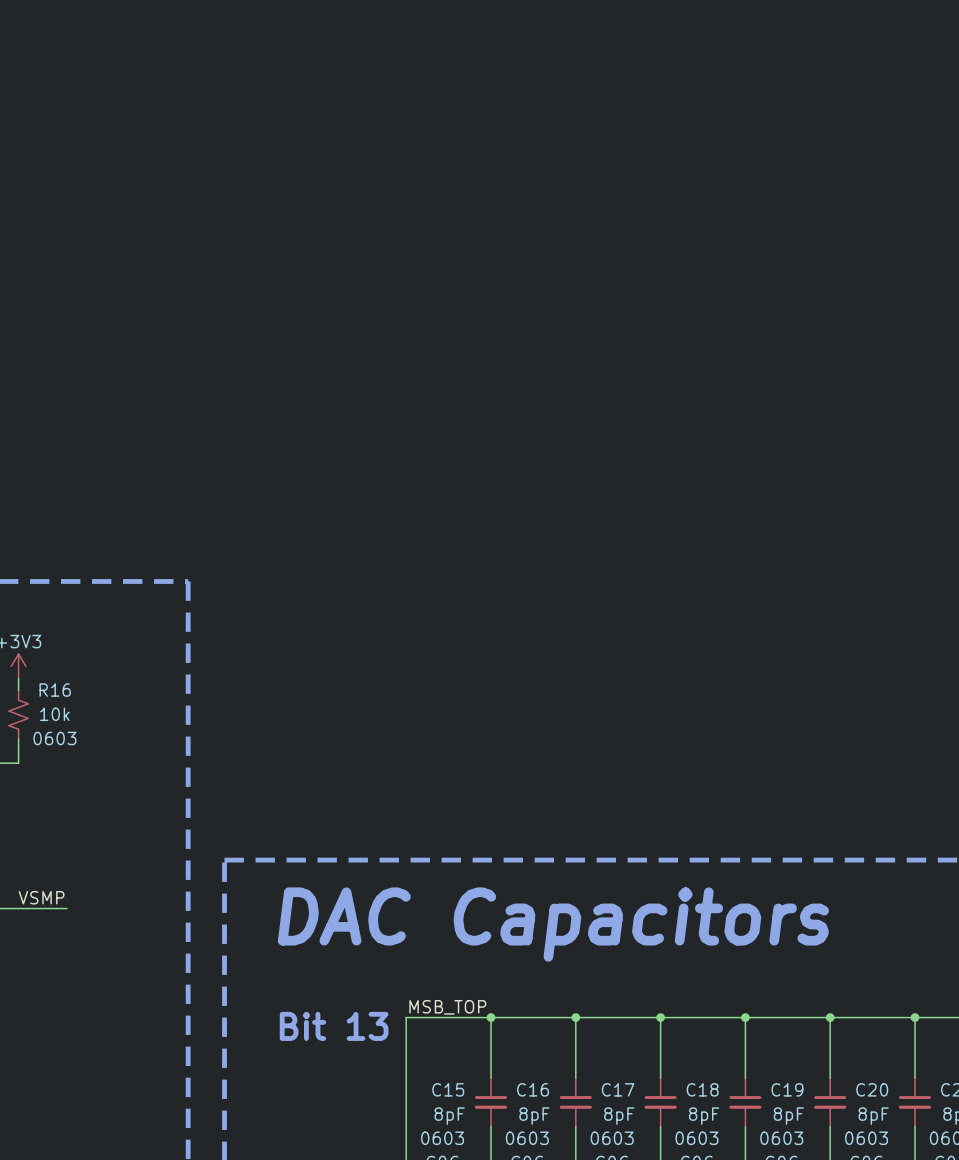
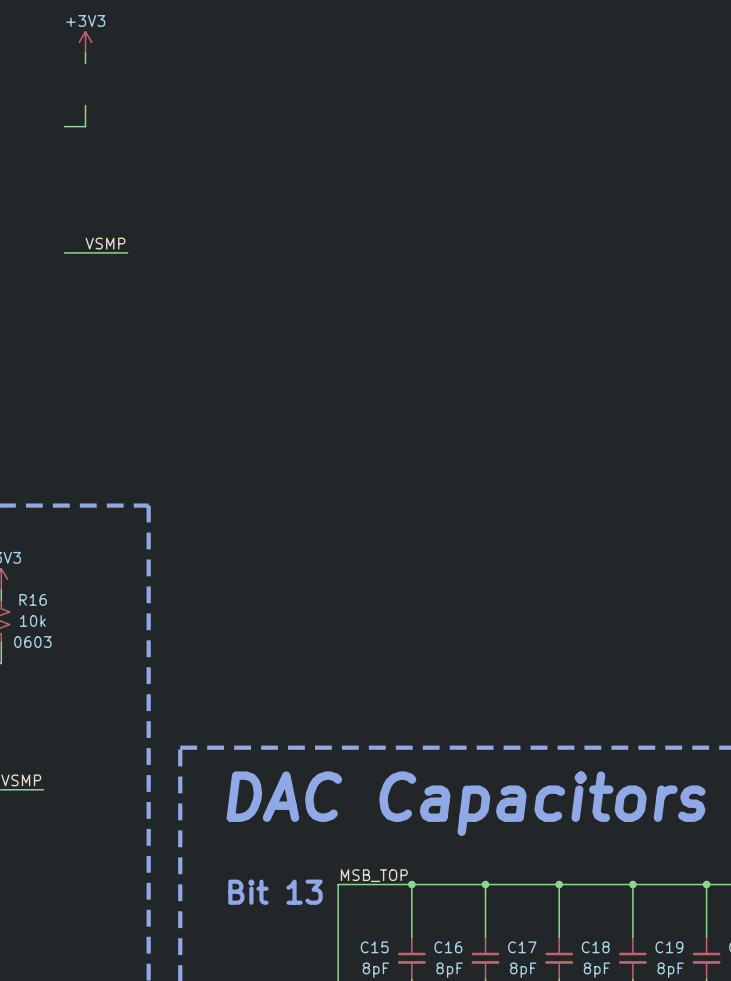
power symbol: none -> +3V3 (85, 42)
wire: none -> (85, 52) (85, 63)
wire: none -> (85, 105) (85, 126) (64, 126)
label: none -> VSMP (105, 243)
wire: none -> (64, 252) (127, 252)

